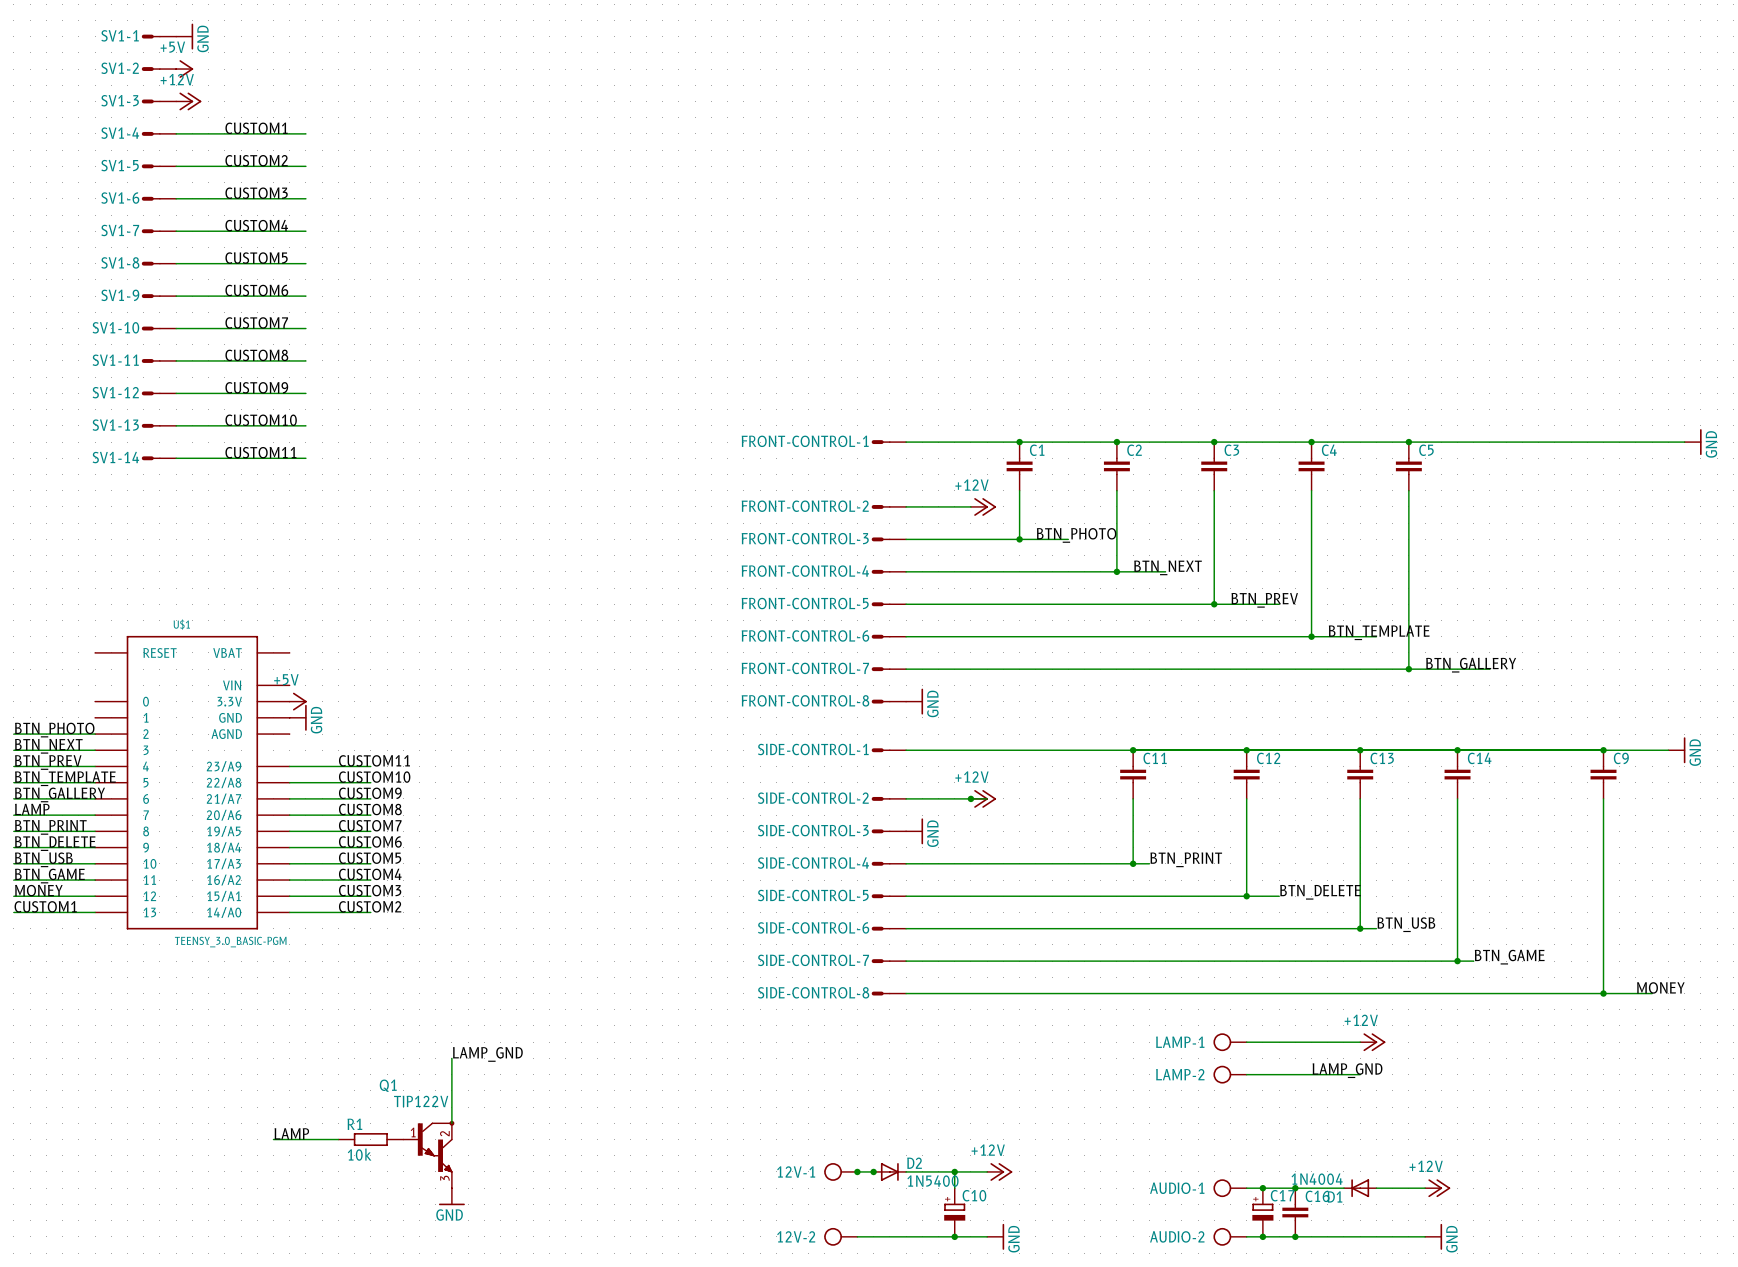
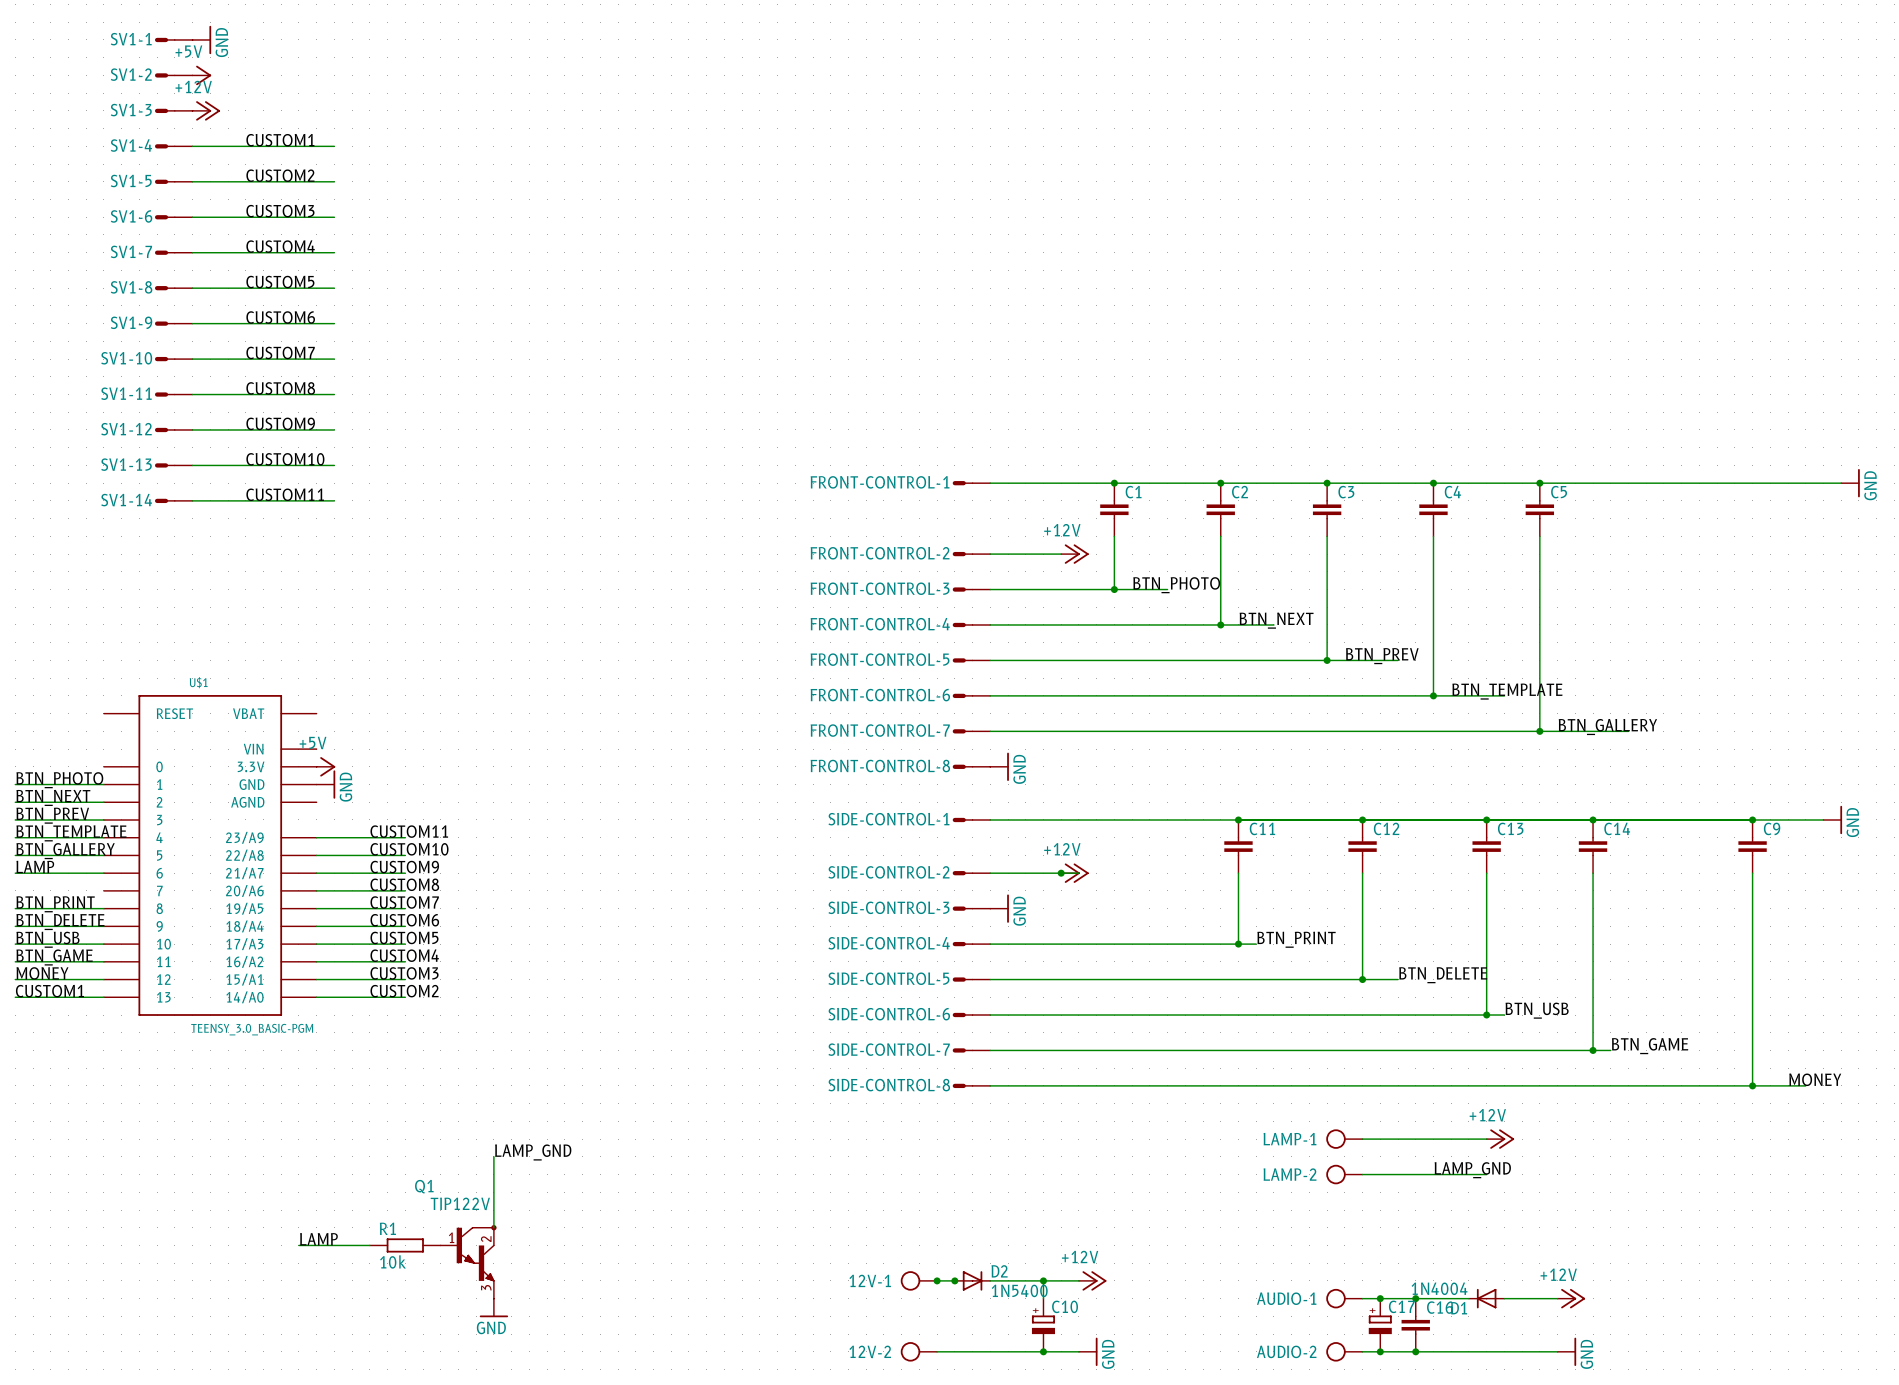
label: none -> BTN_PHOTO (59, 780)
label: BTN_PHOTO (54, 730) -> BTN_NEXT (53, 797)
label: BTN_NEXT (48, 746) -> BTN_PREV (52, 815)
label: BTN_PREV (48, 762) -> BTN_TEMPLATE (71, 833)
label: BTN_TEMPLATE (65, 778) -> BTN_GALLERY (65, 851)
label: BTN_GALLERY (60, 794) -> LAMP (35, 866)
label: LAMP (32, 809) -> none
wire: (13, 815) (95, 815) -> (15, 784) (103, 784)

